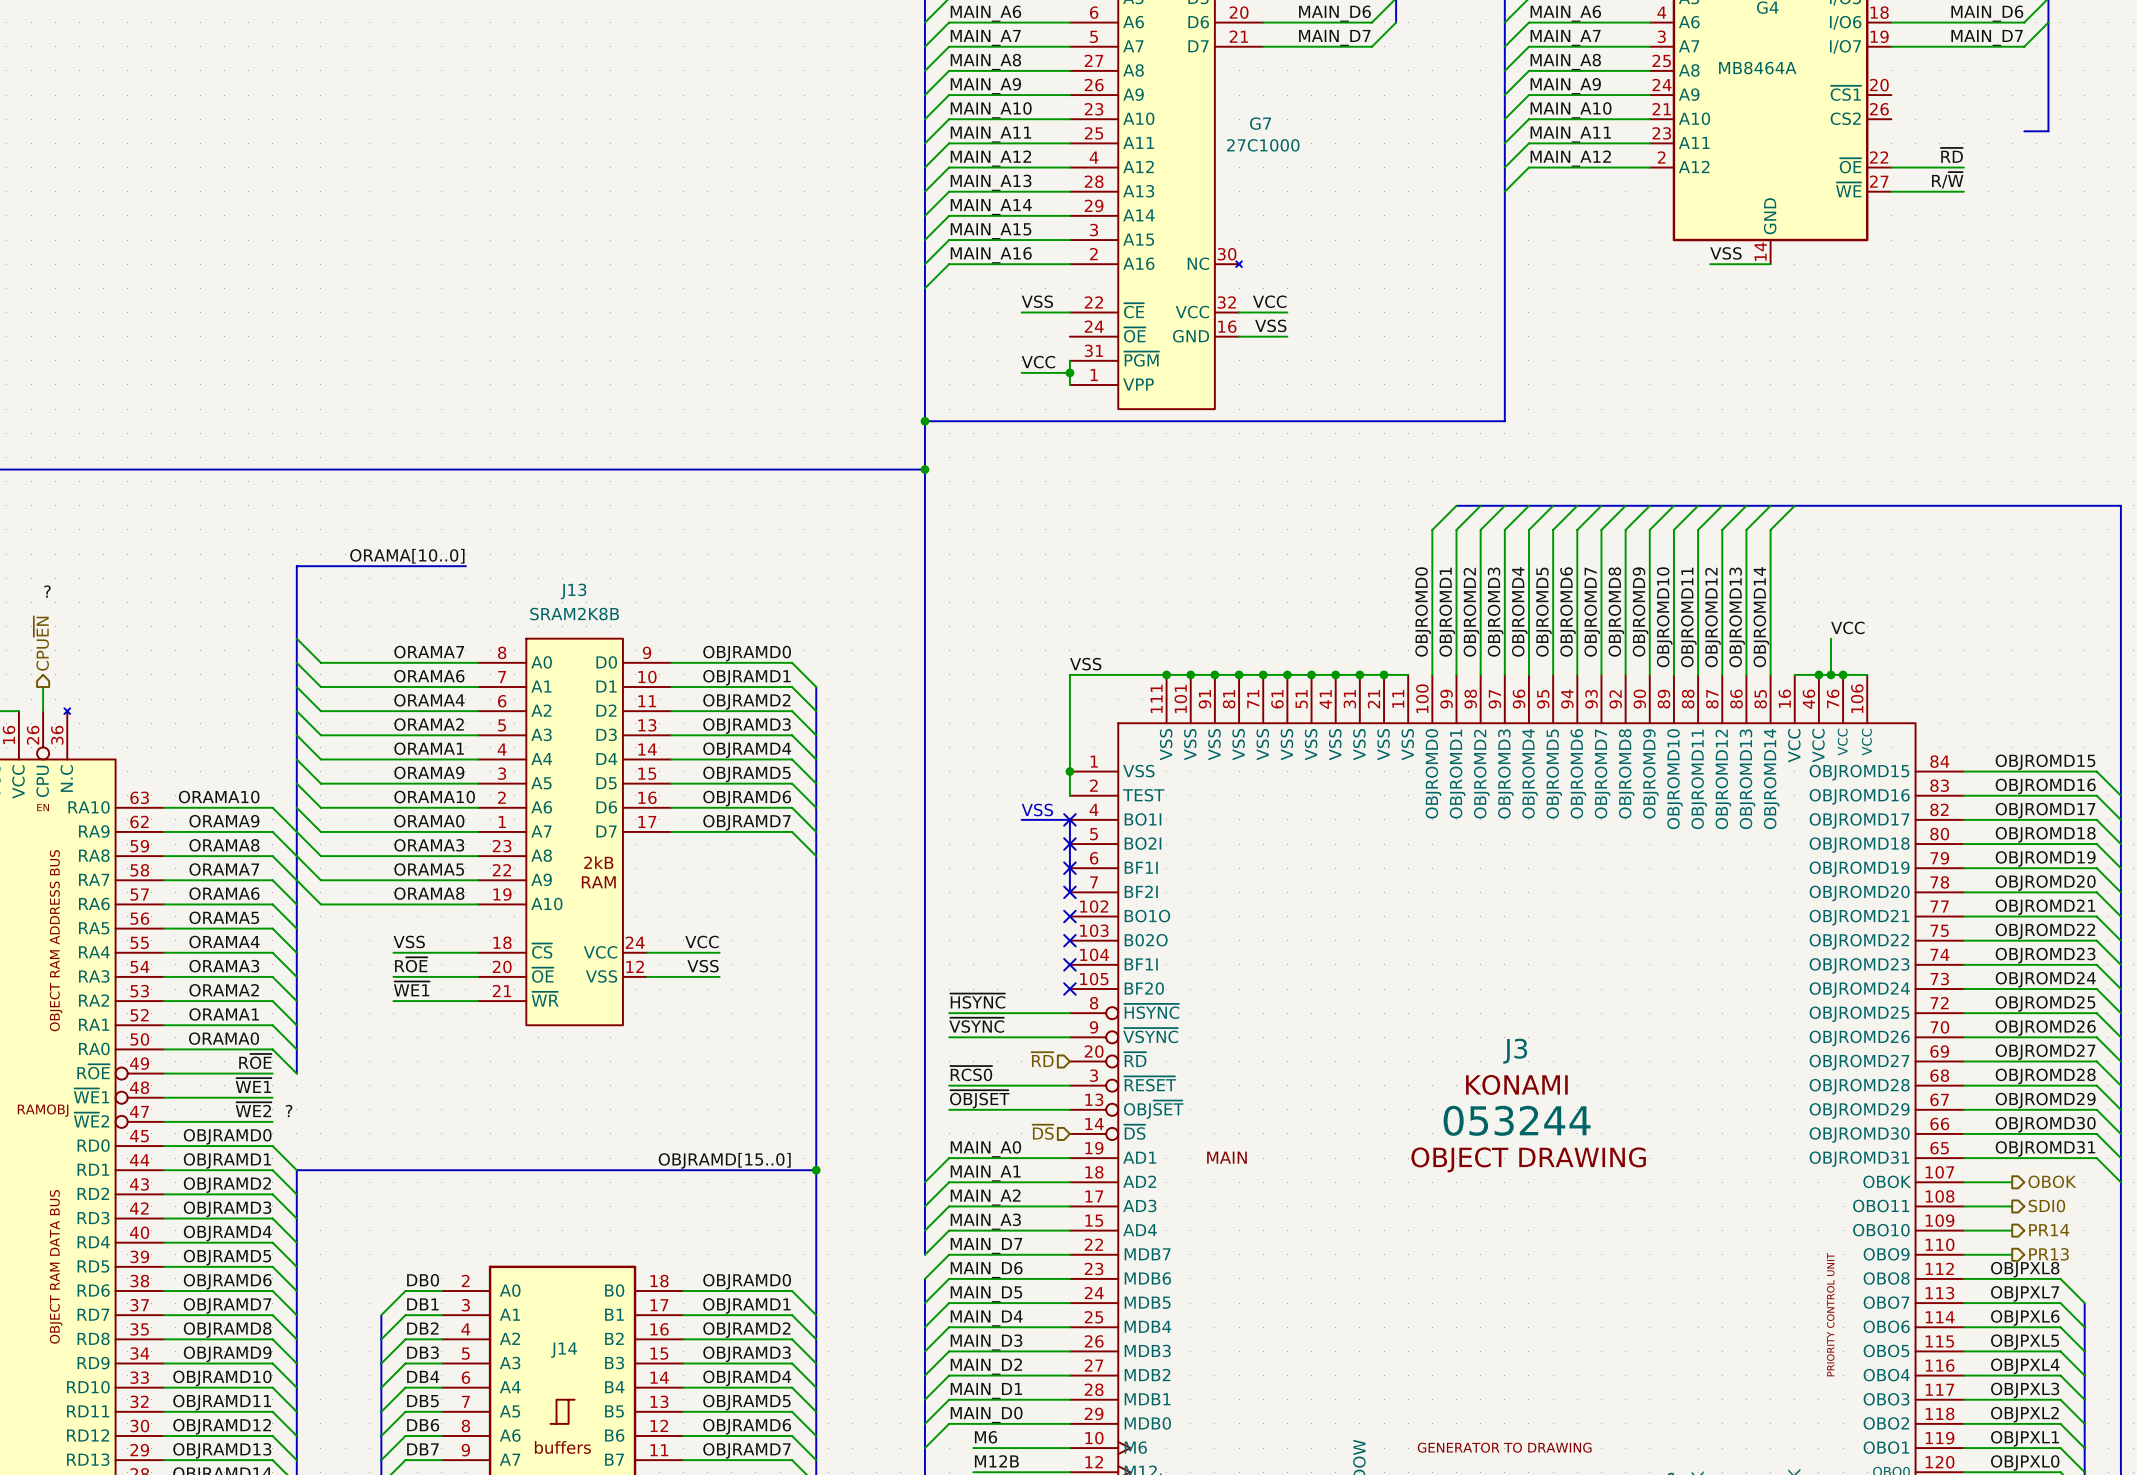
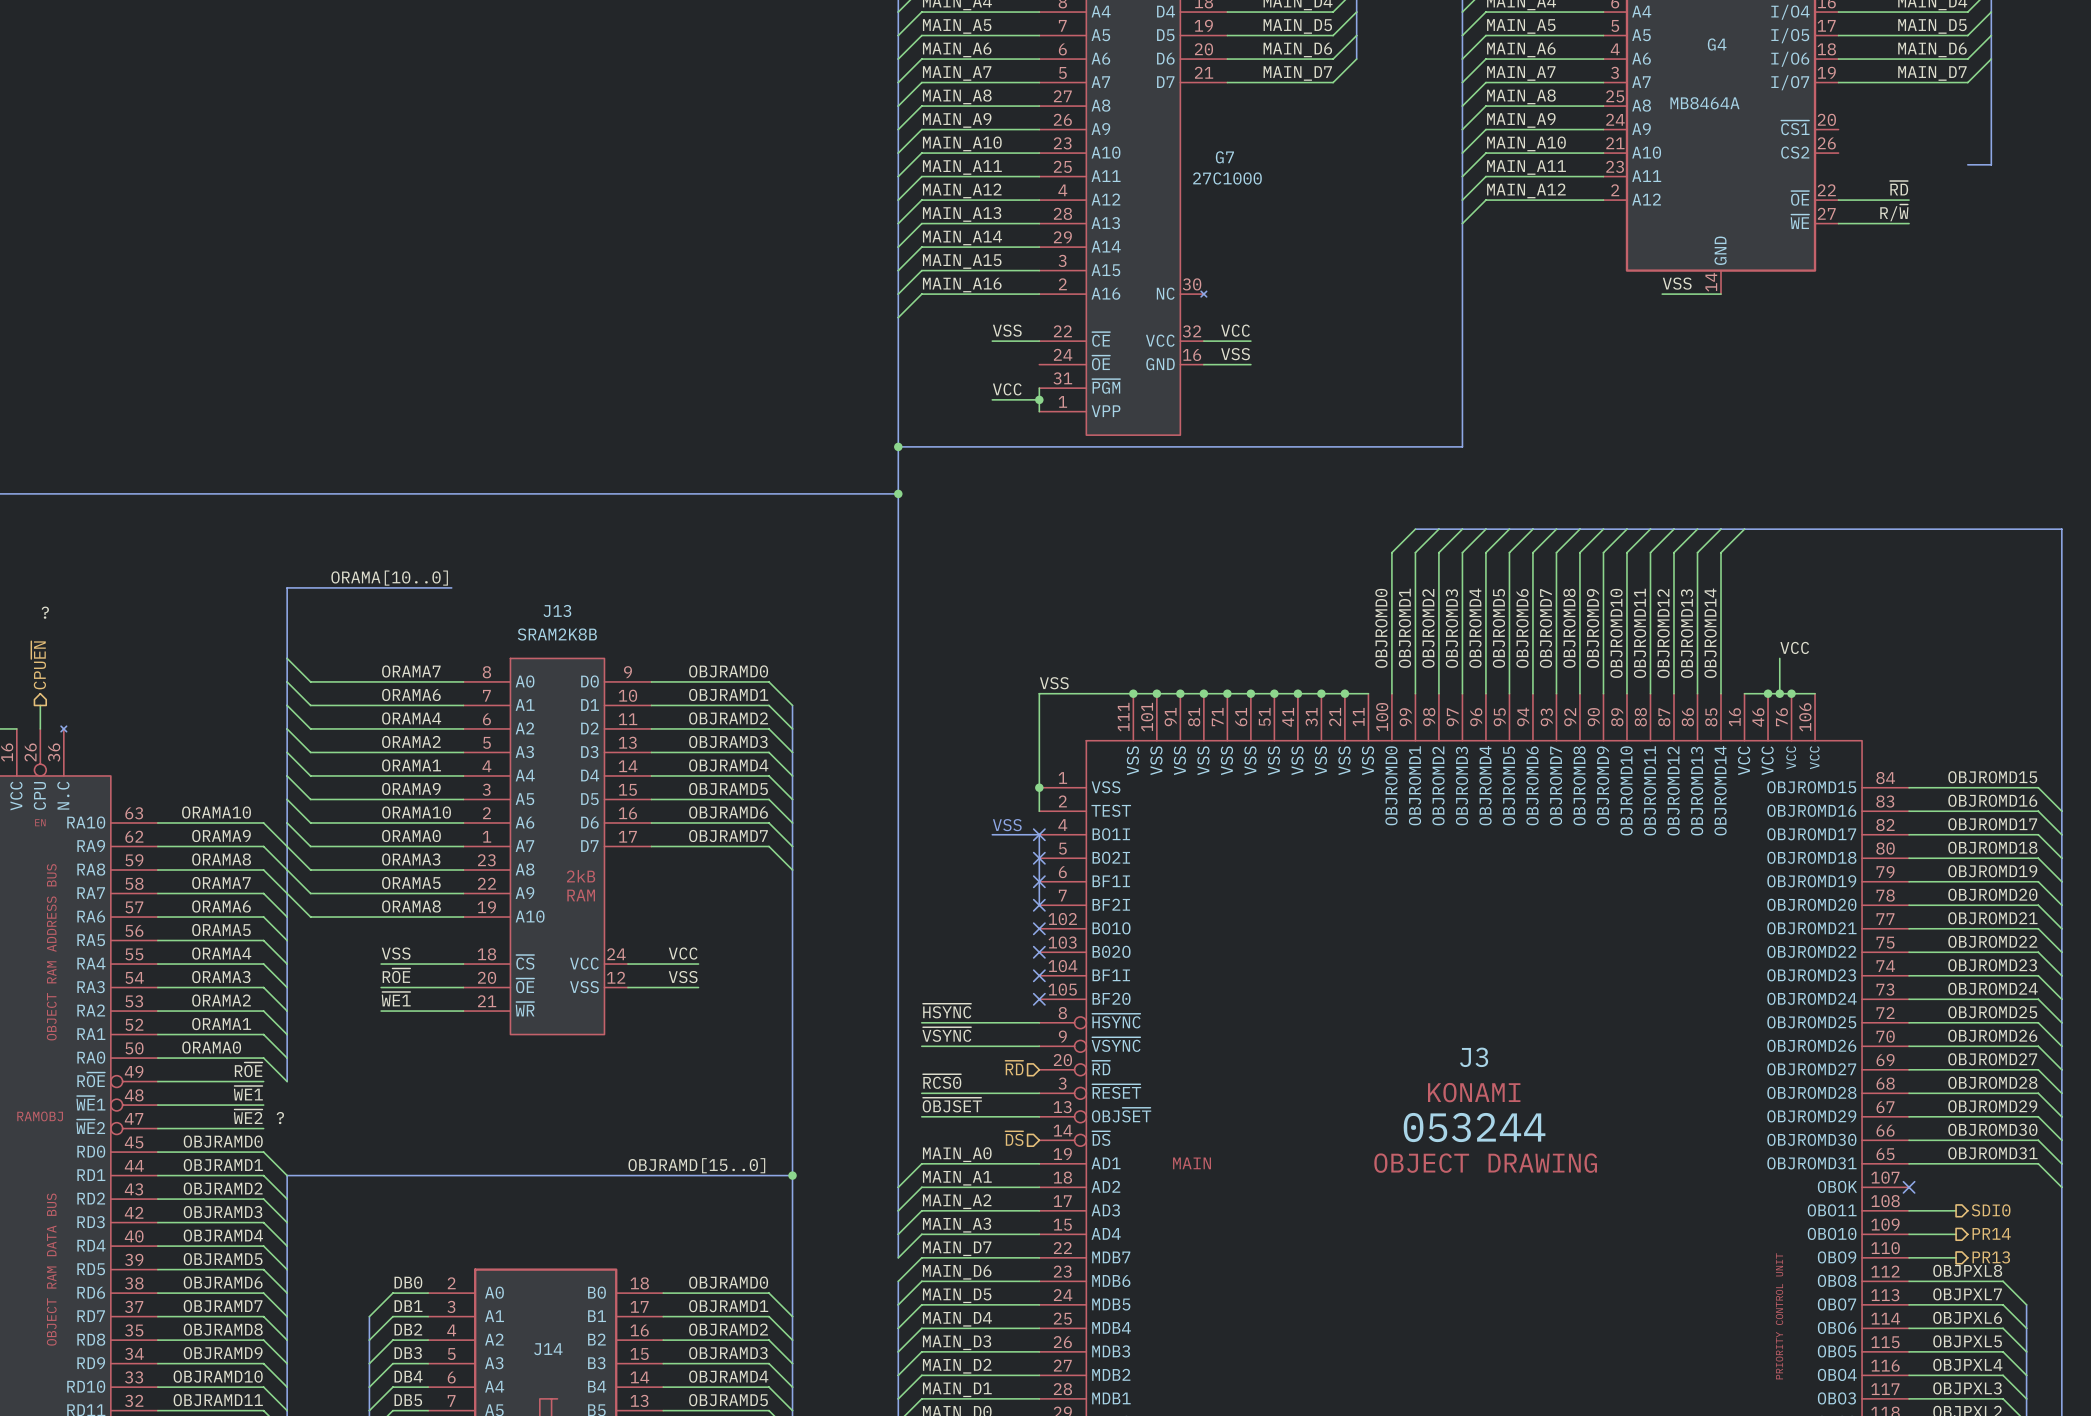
hierarchical label: OBOK (2052, 1181) -> none
wire: (1963, 1182) (2012, 1182) -> none
no-connect mark: none -> (1909, 1187)

